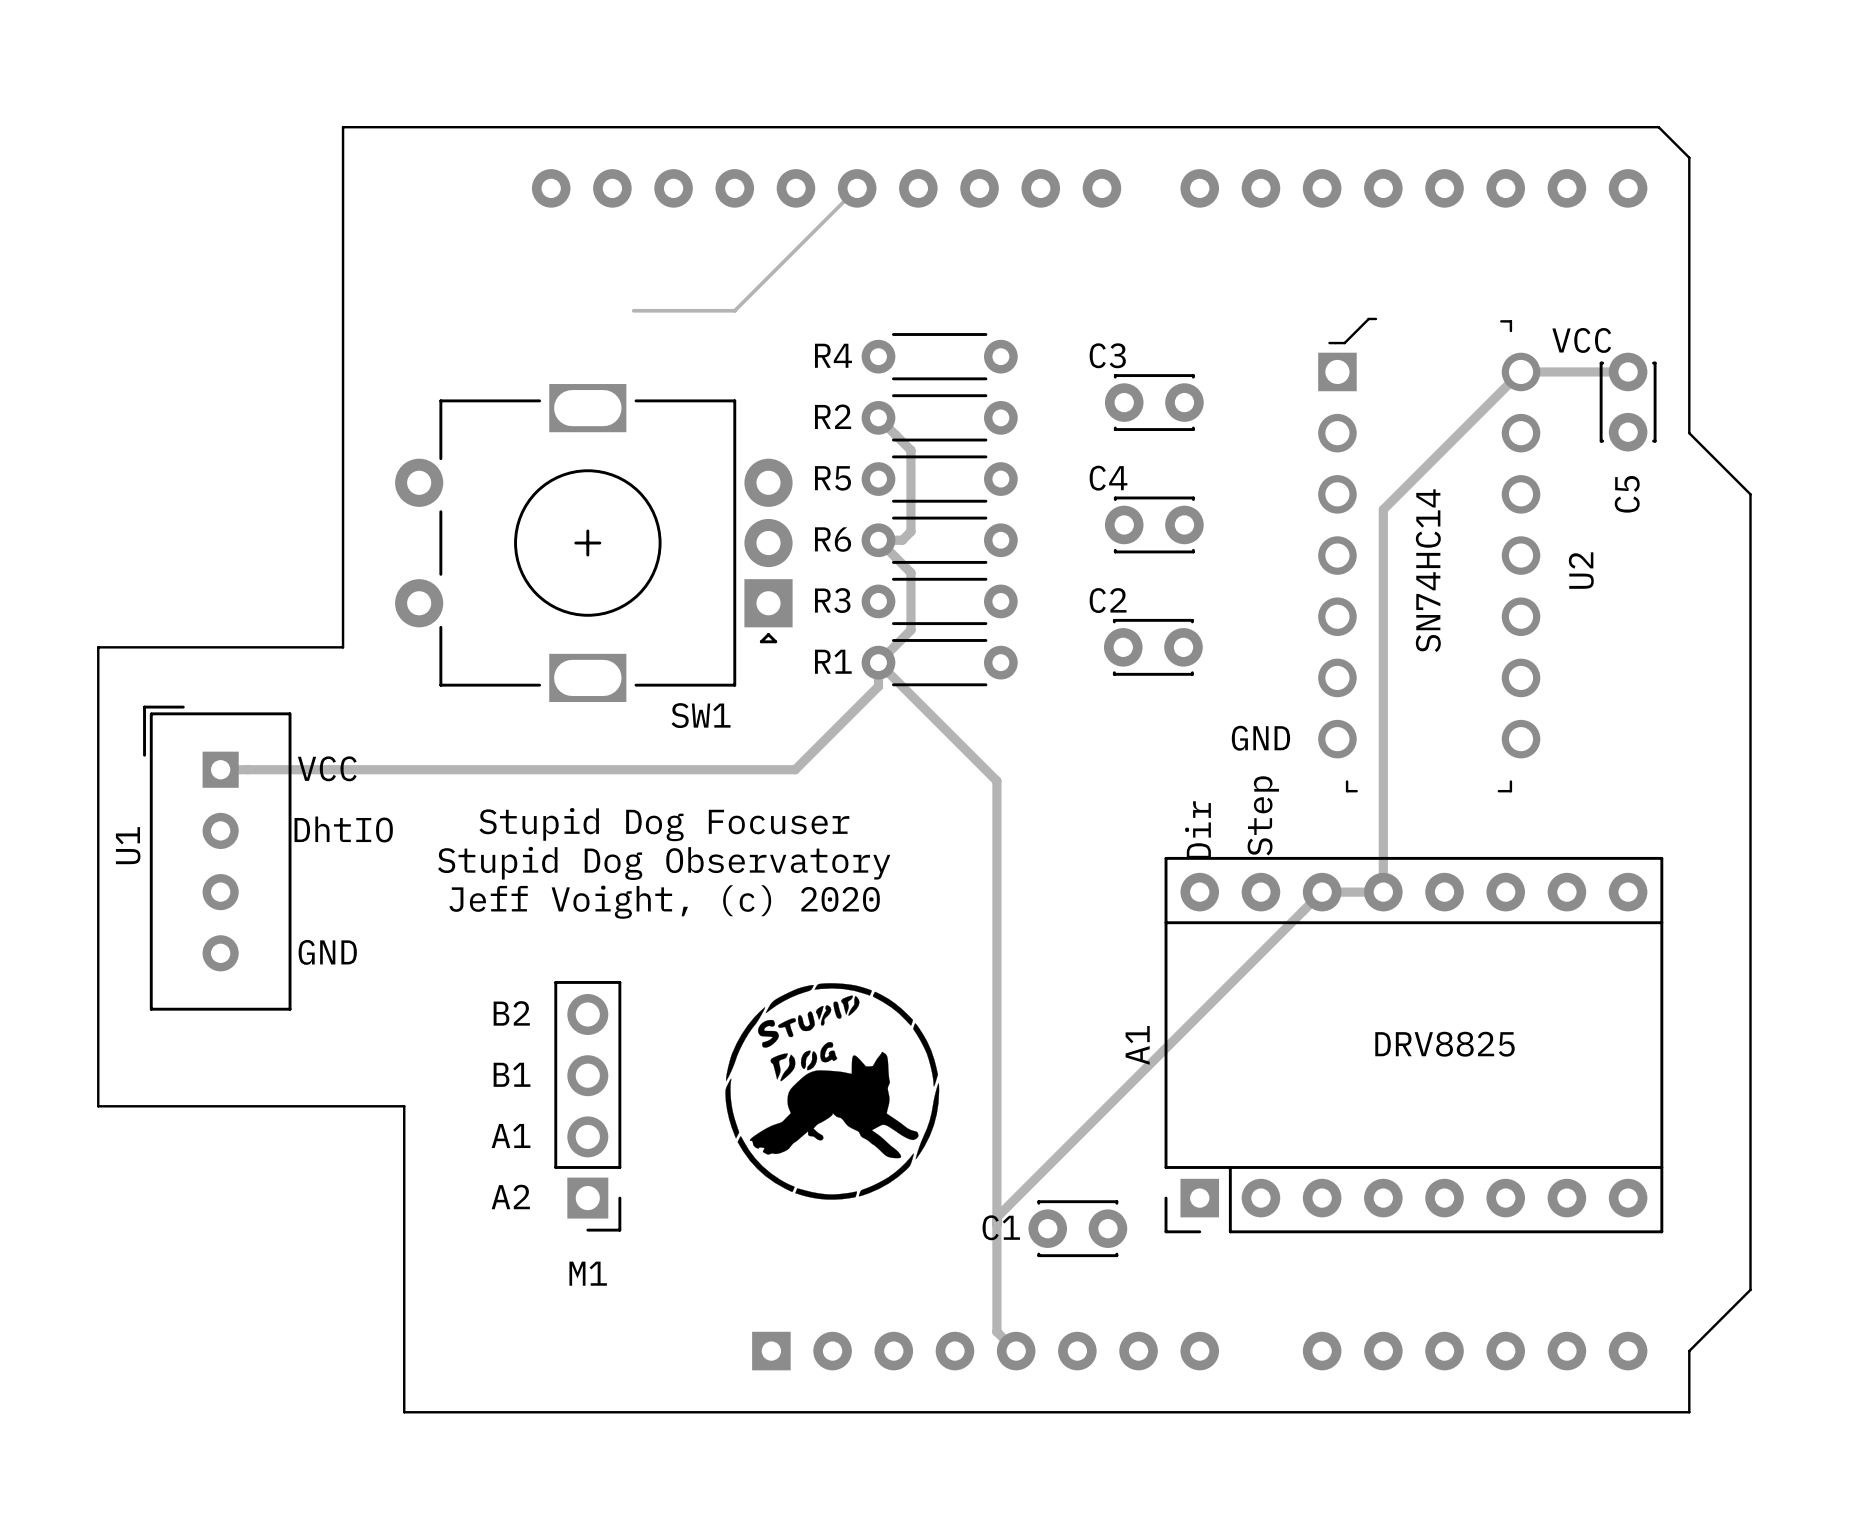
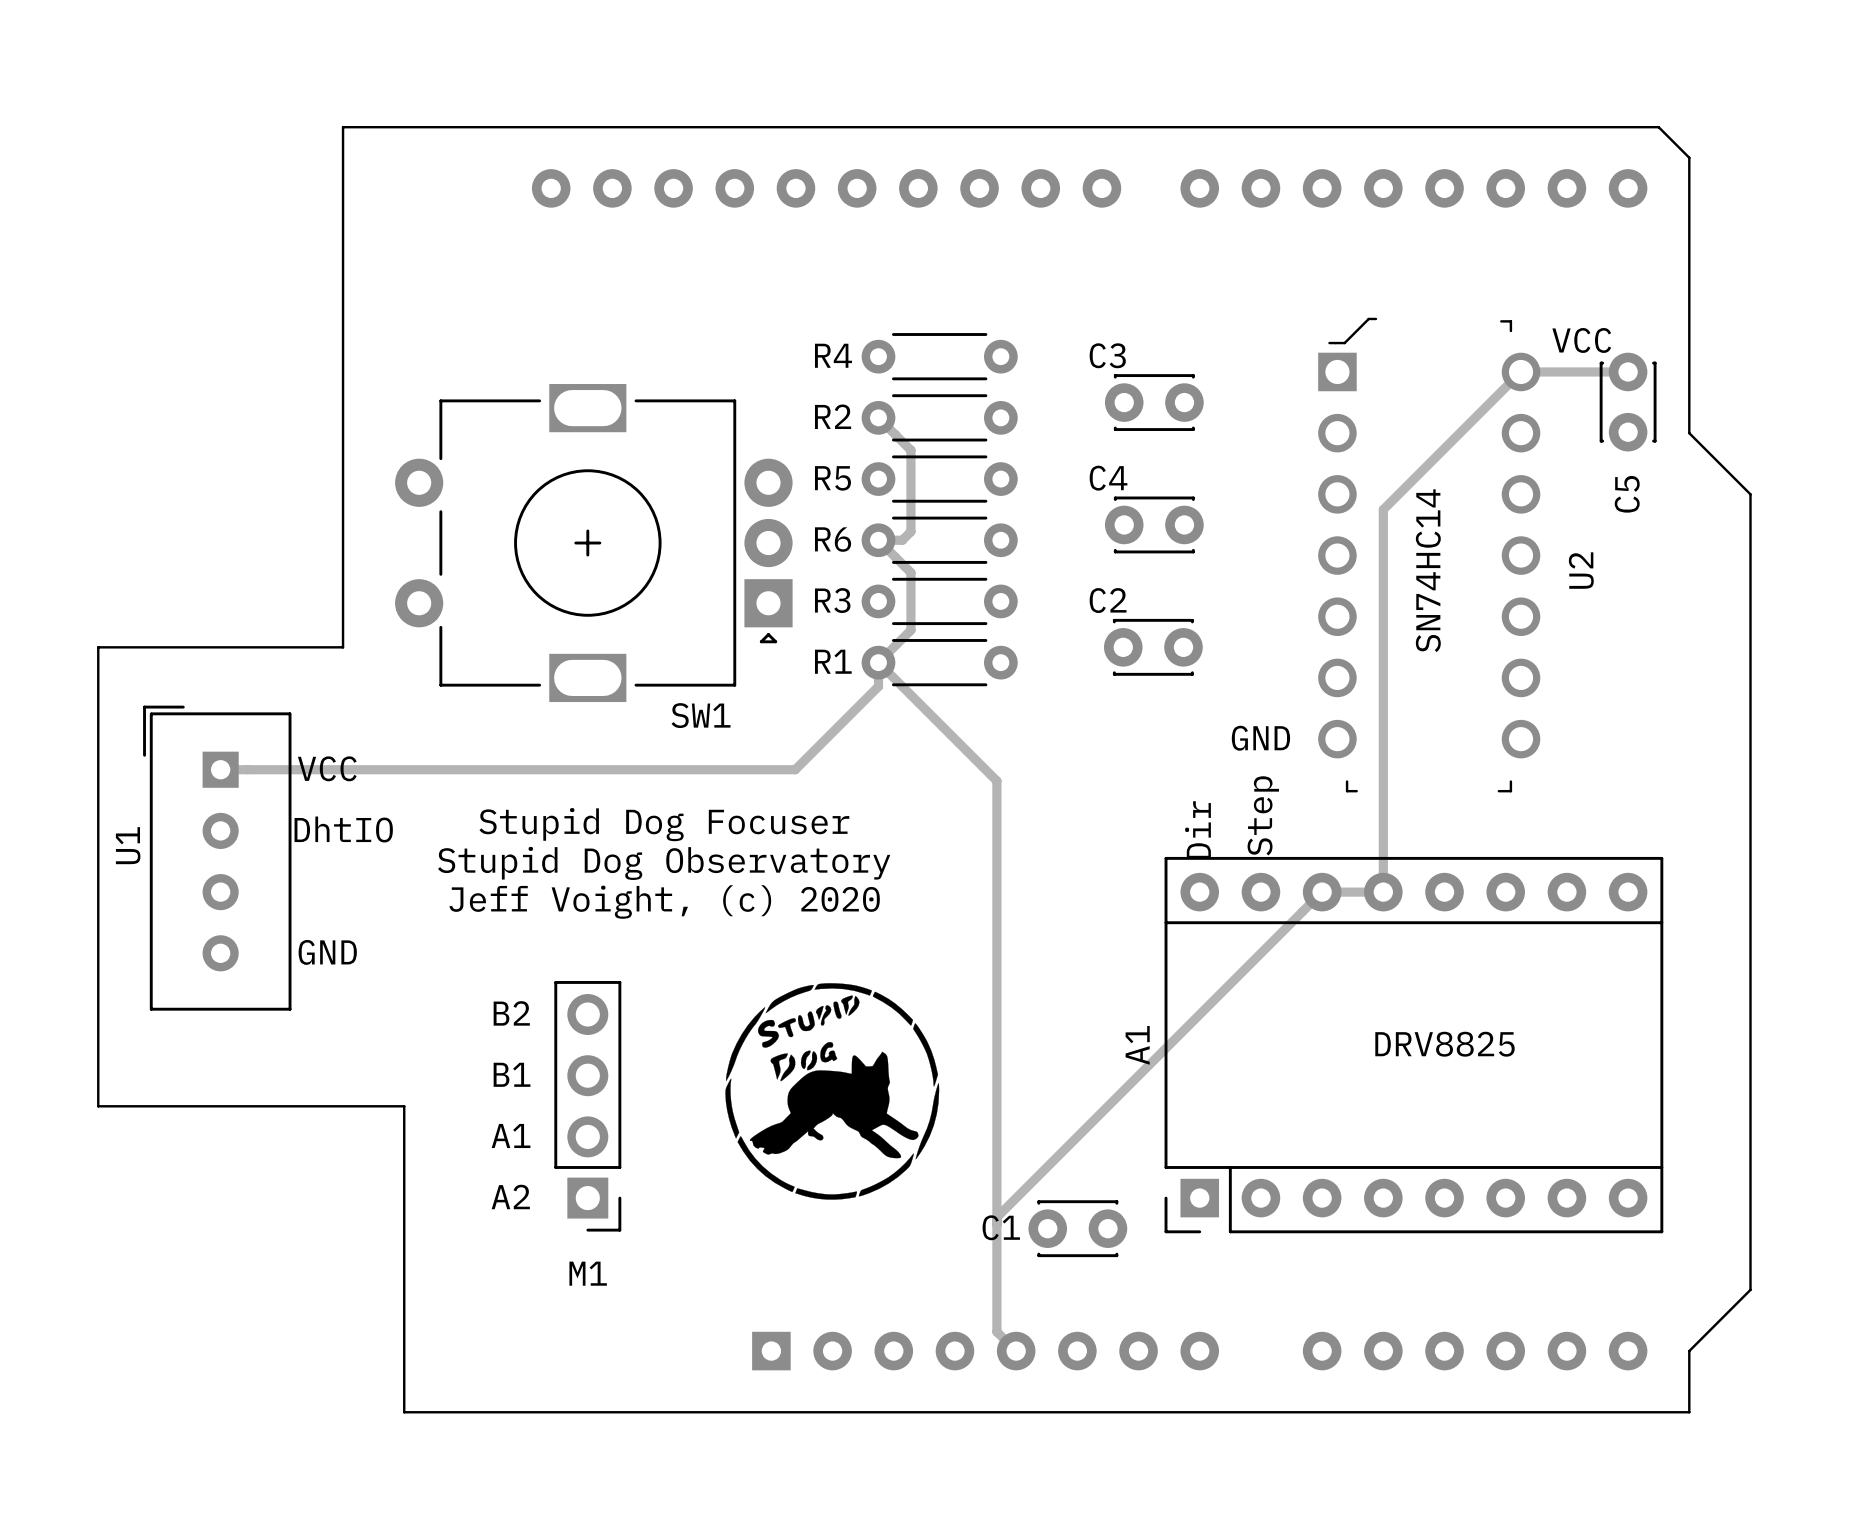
track: (857, 188) (734, 310) (633, 310) -> none

